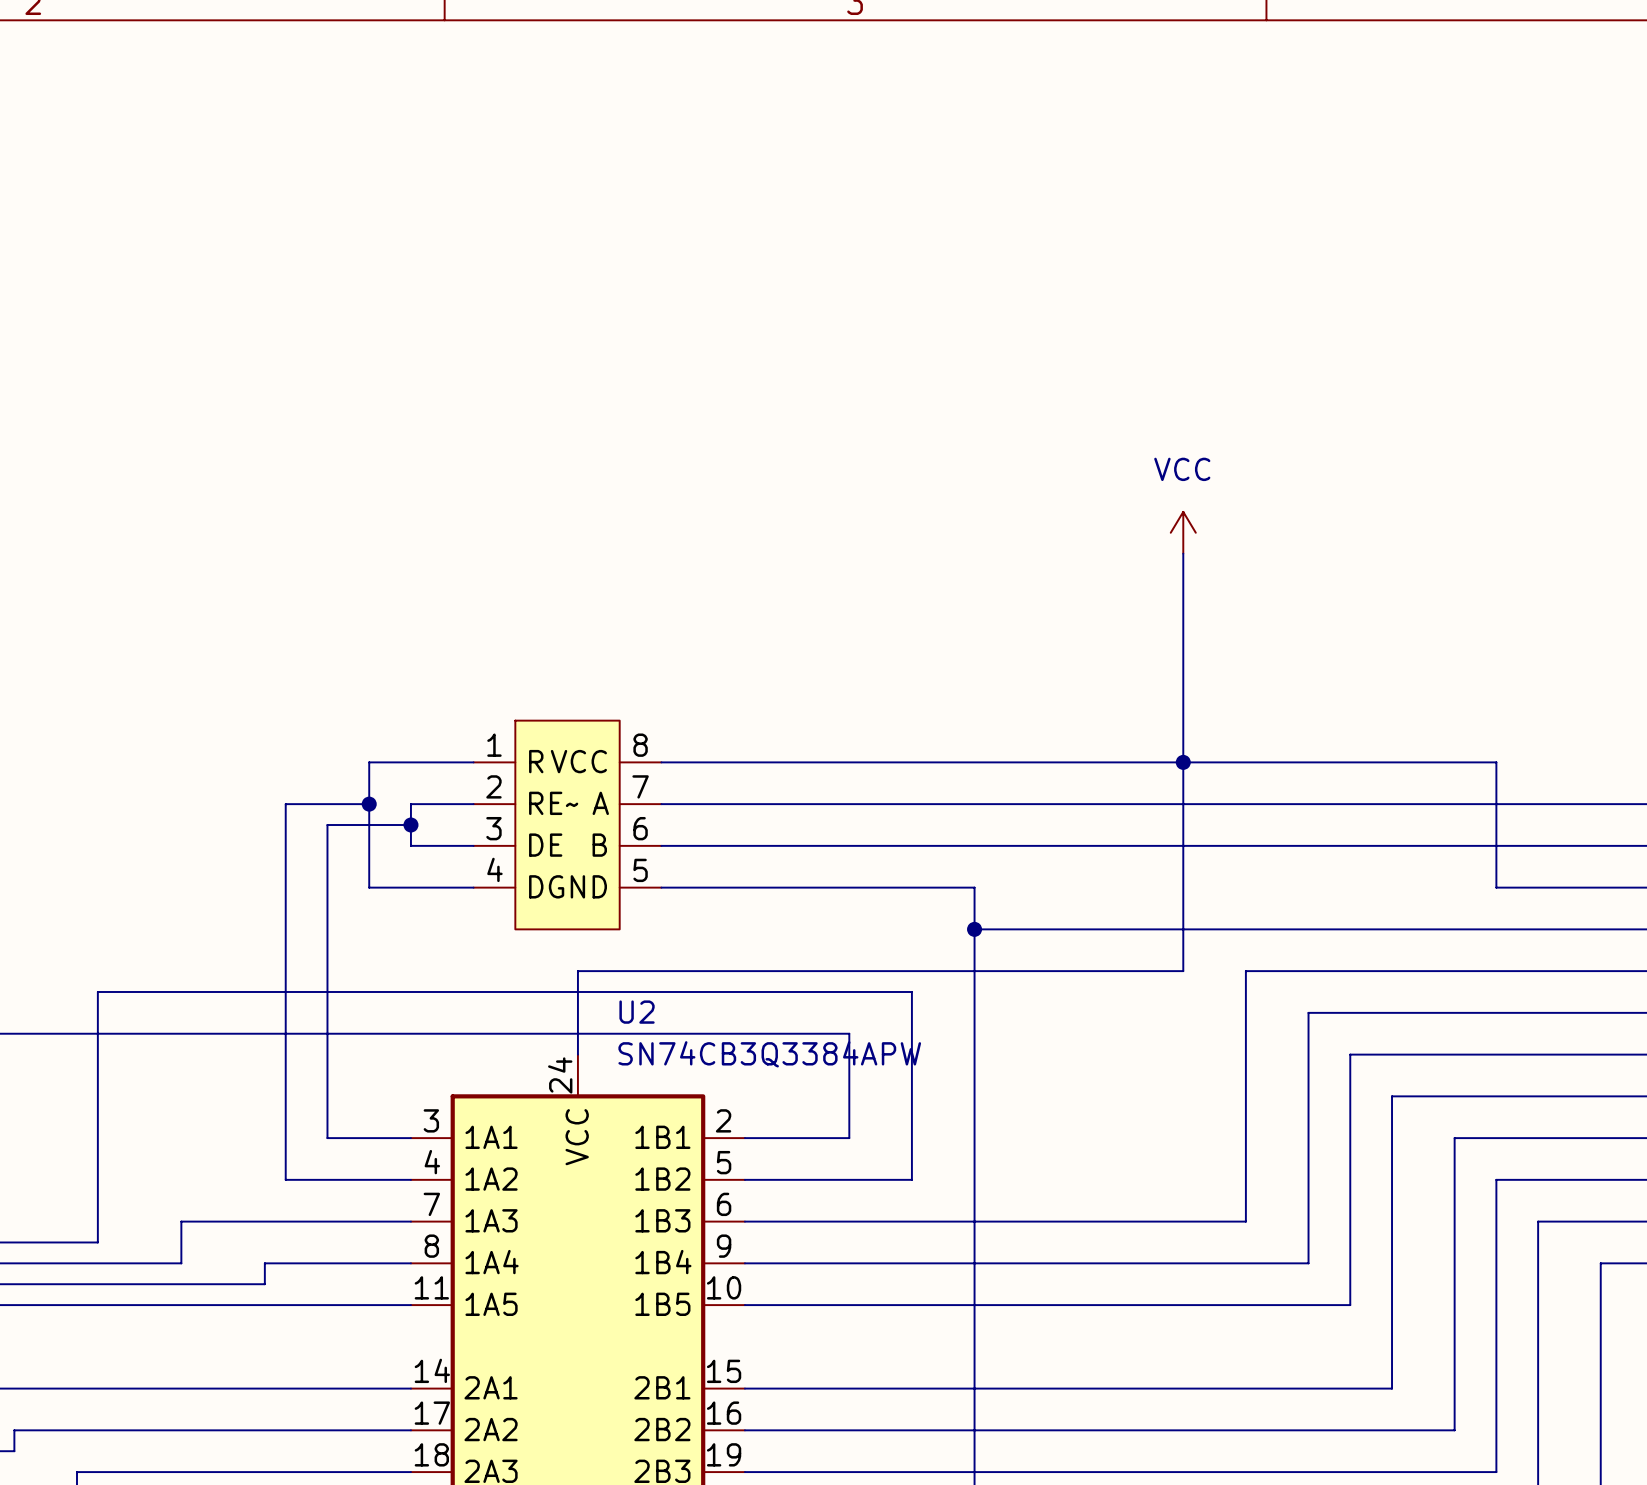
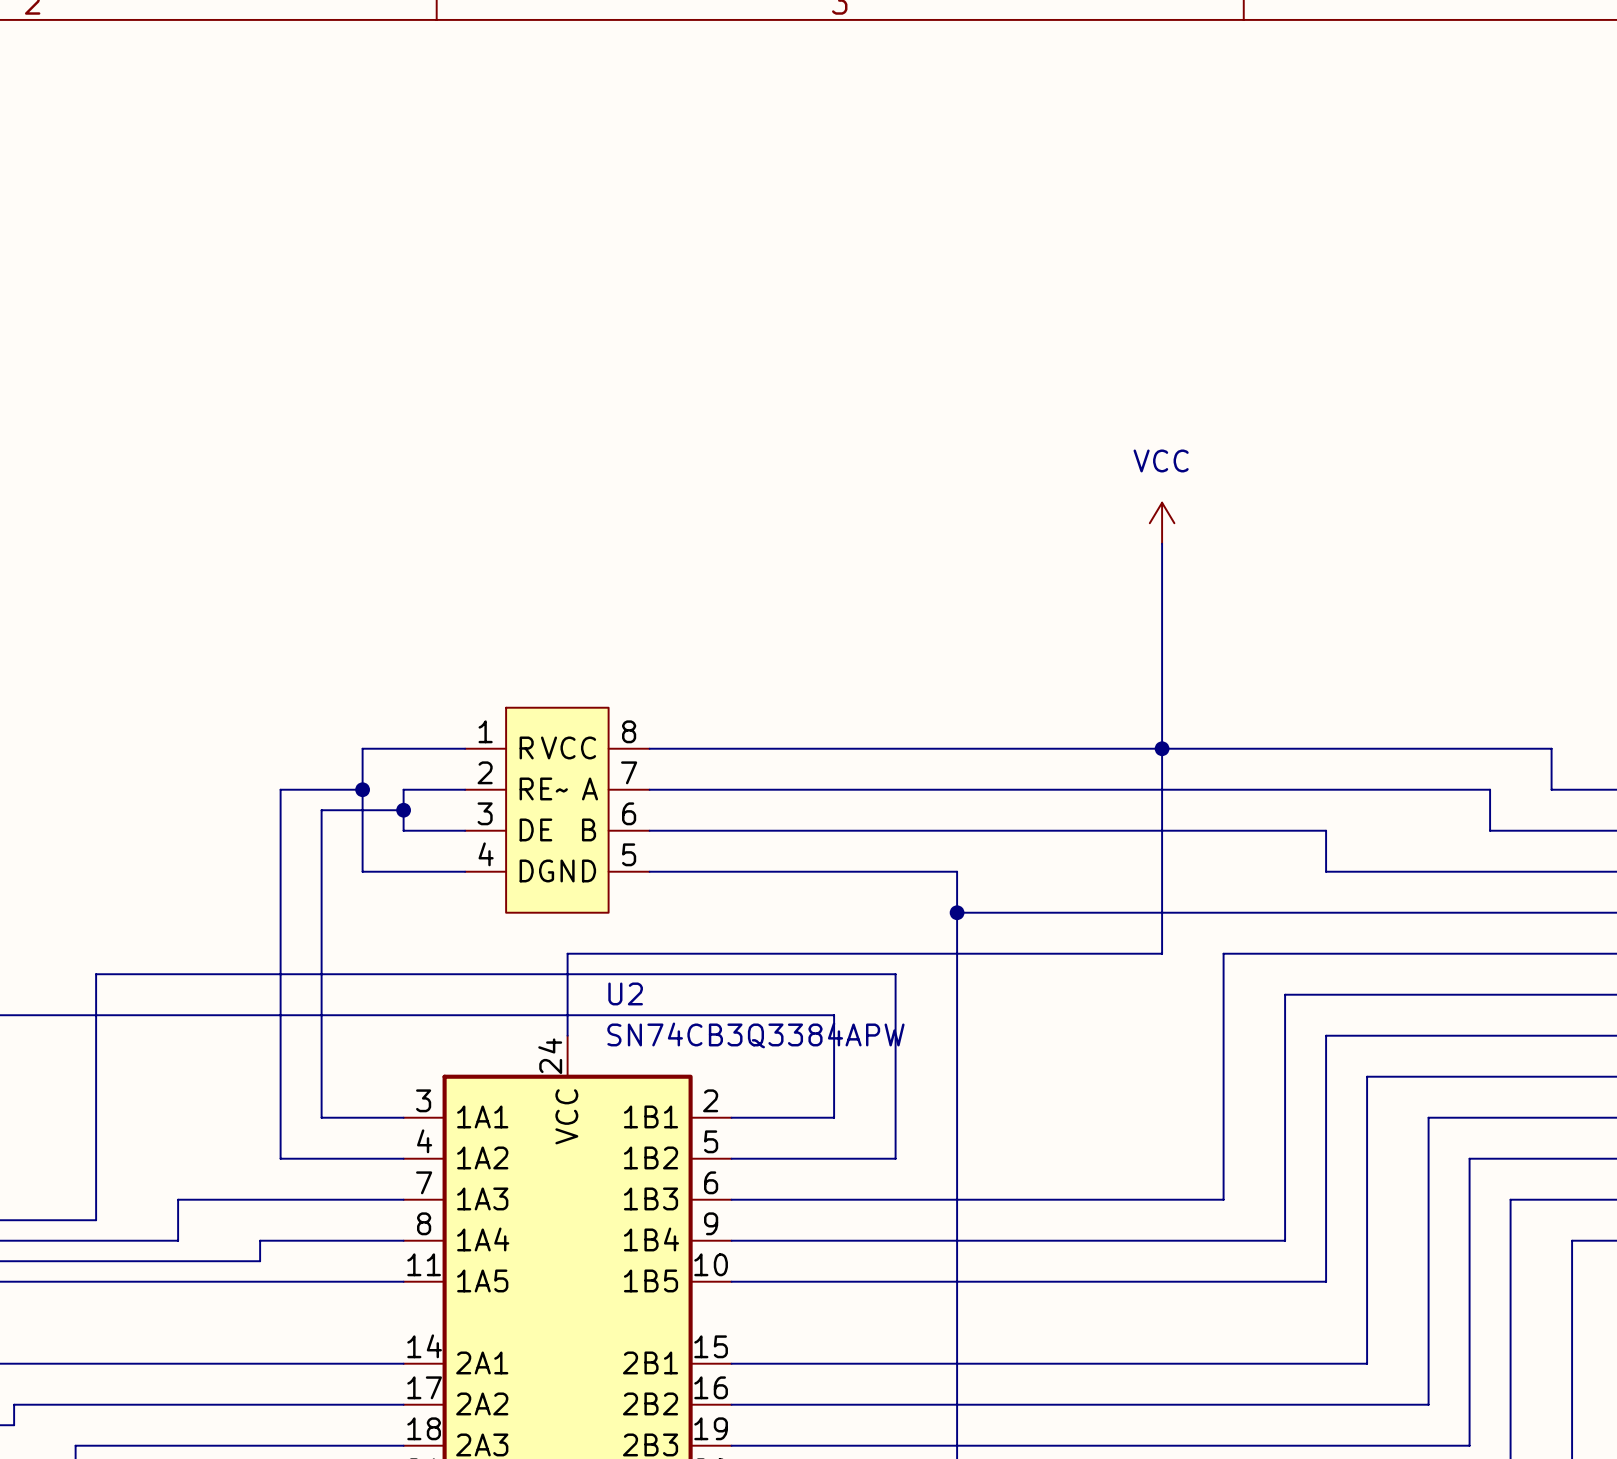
wire: (1496, 762) (1496, 887) -> none
wire: (1517, 804) (1579, 804) -> (1469, 748) (1551, 748) (1551, 789)
wire: none -> (1490, 789) (1490, 830)
wire: (1350, 845) (1517, 845) -> (1326, 830) (1326, 871) (1469, 871)

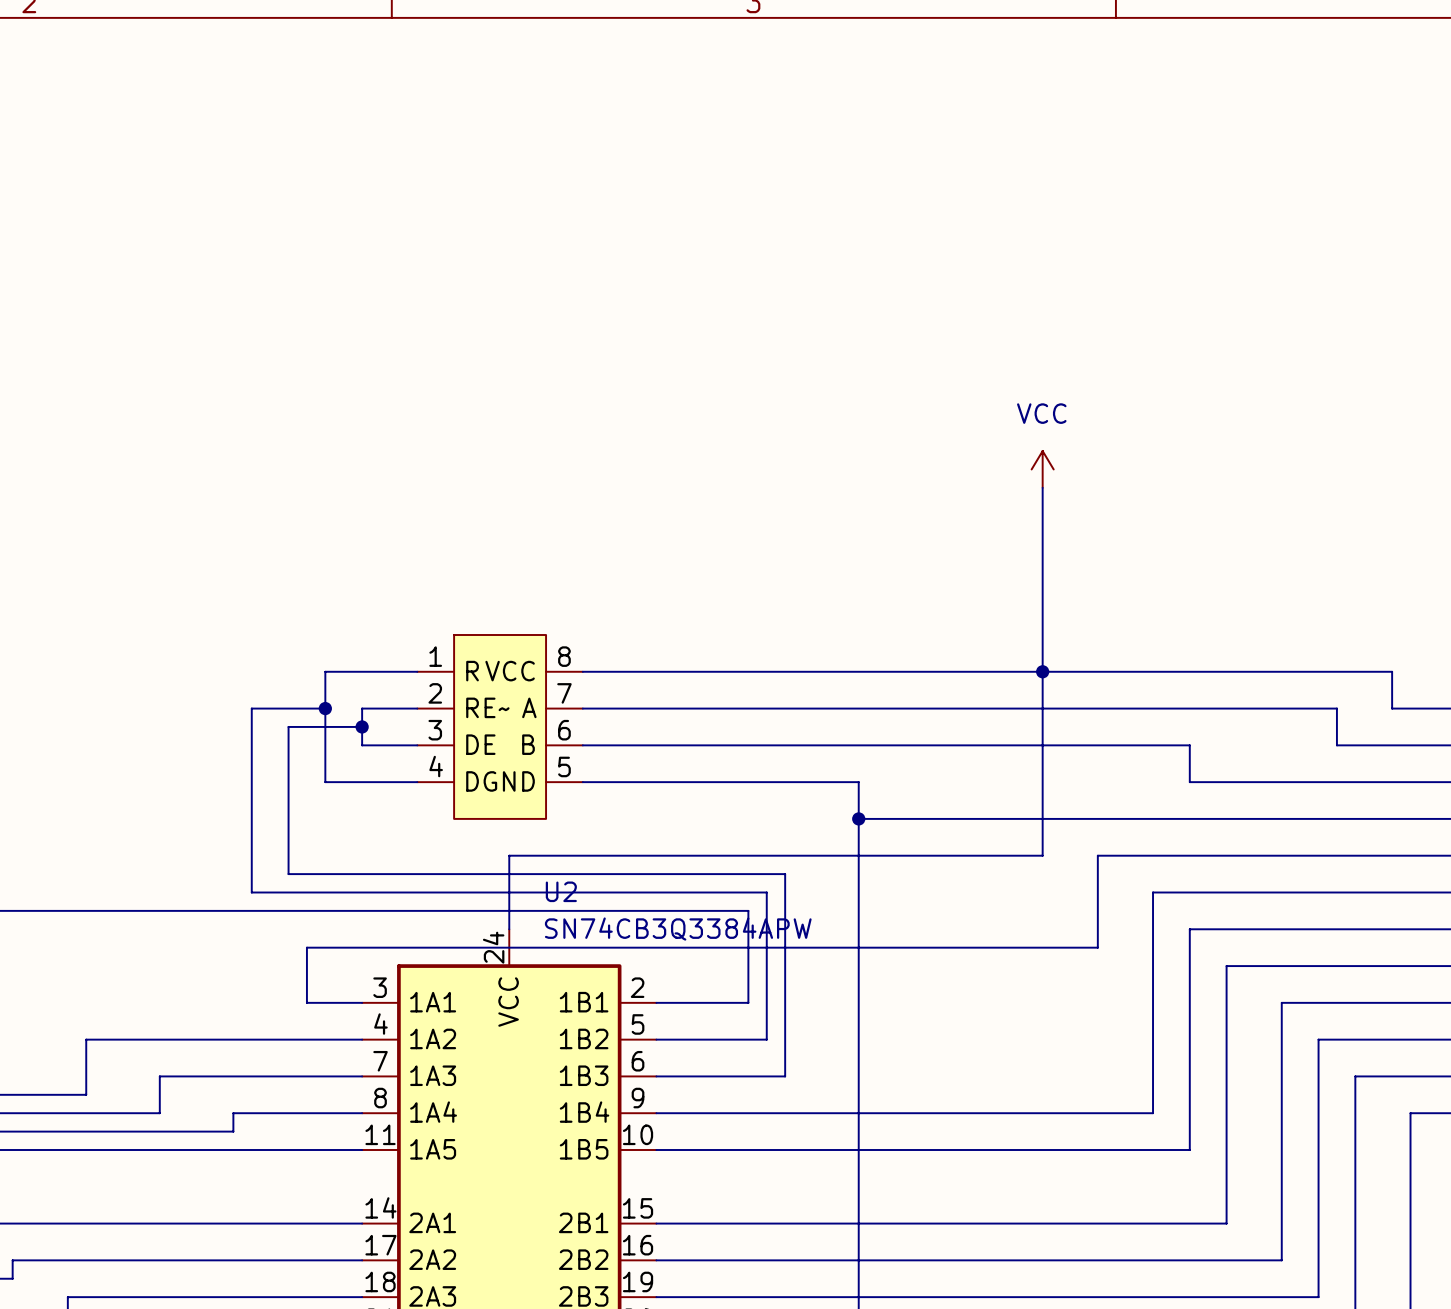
wire: (875, 974) (895, 974) (895, 1158) (854, 1158) -> (785, 874) (785, 1076)
wire: (280, 994) (280, 1158) -> (251, 892) (766, 892) (766, 1039)
wire: (1223, 1056) (1223, 1199) (875, 1199) -> (1097, 947) (306, 947) (306, 1002)
wire: (342, 1117) (321, 1117) (321, 974) (96, 974) (96, 1158) -> (251, 1039) (86, 1039)

